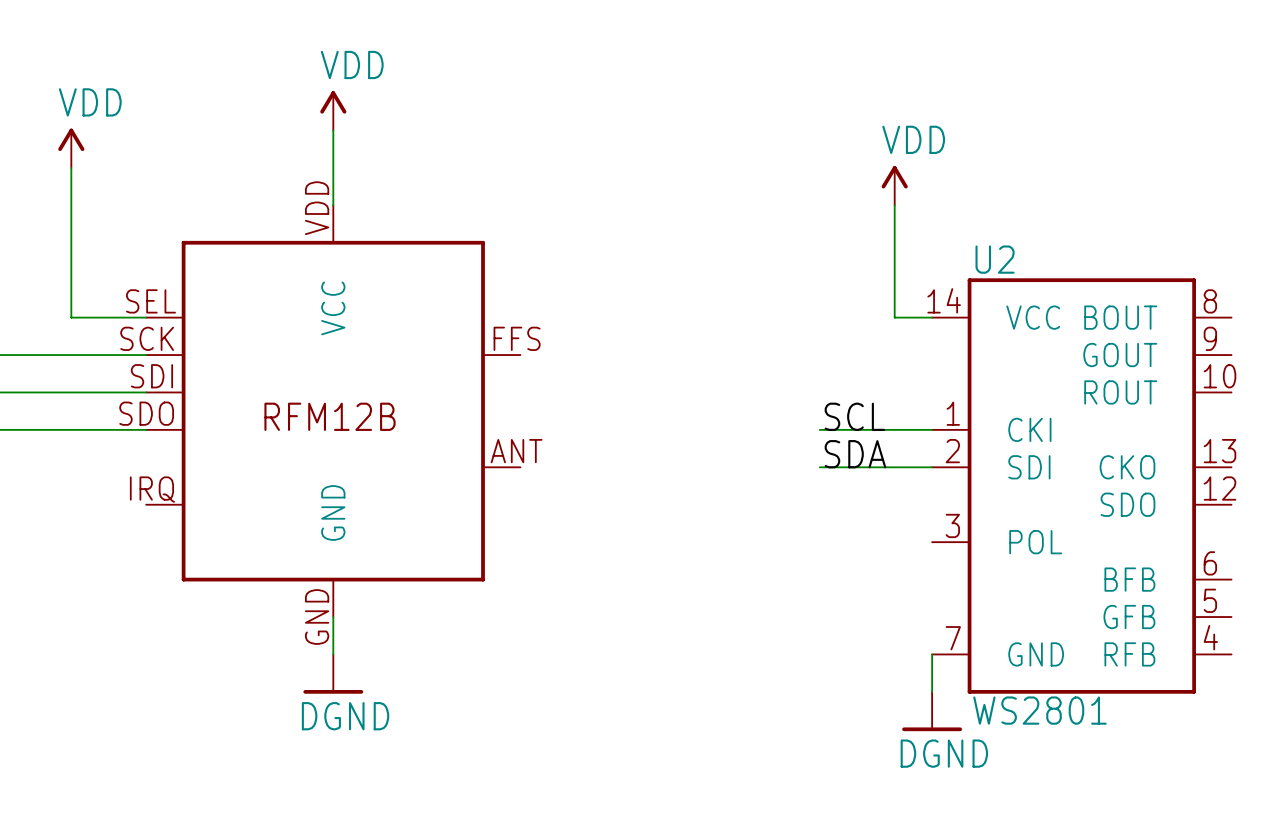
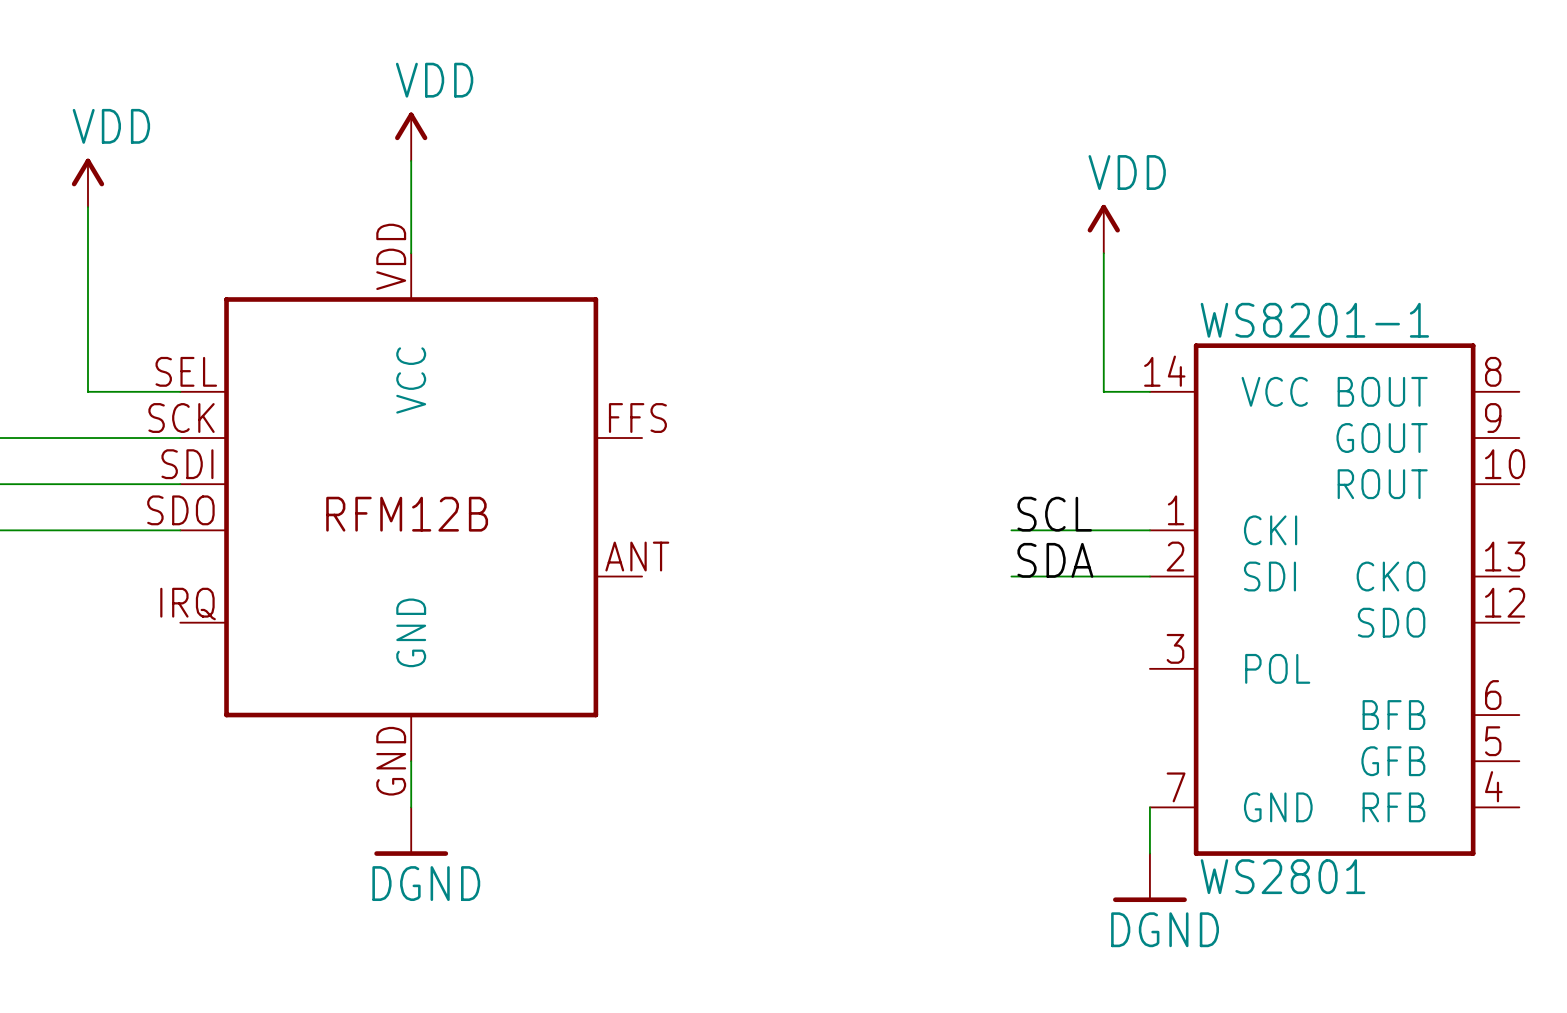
U2 name: U2 (995, 259) -> WS8201-1 (1314, 320)

